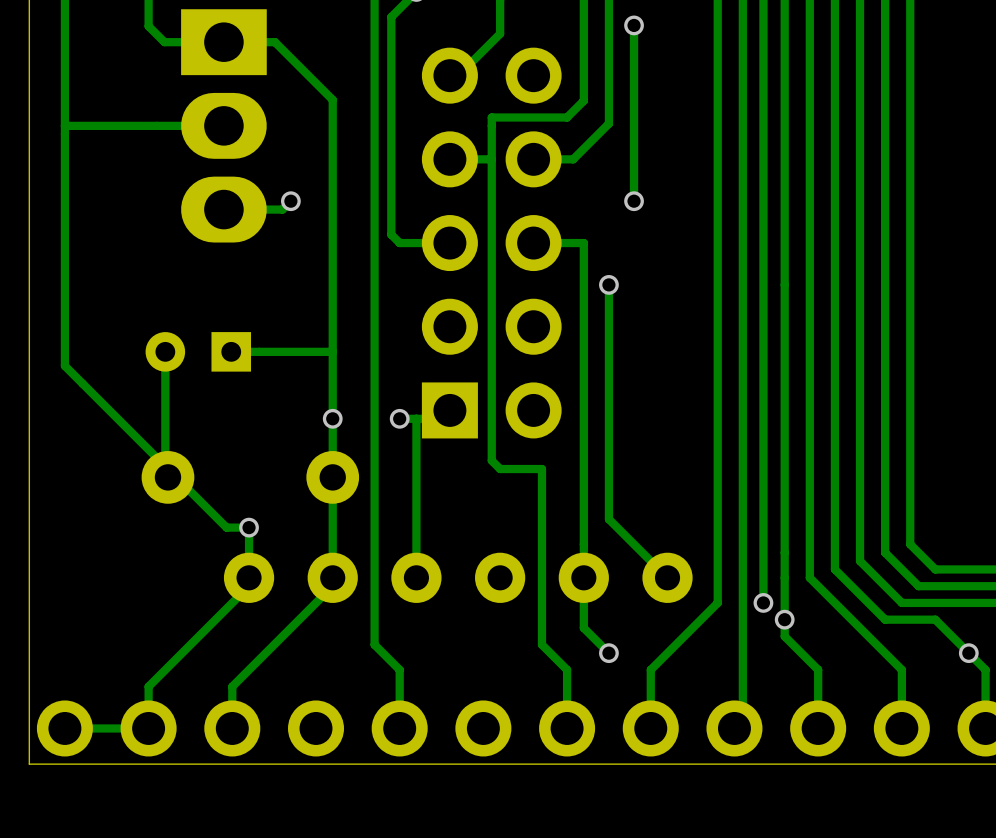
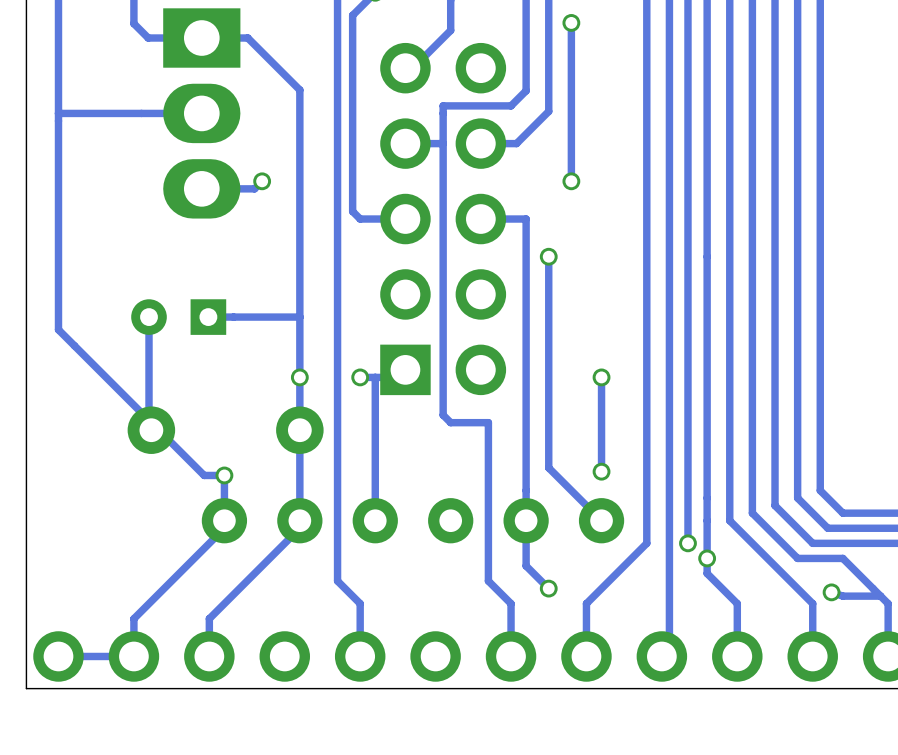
track: none -> (601, 377) (601, 471)
via: none -> (601, 377)
via: none -> (601, 471)
via position: (968, 653) -> (831, 592)
track: none -> (831, 592) (842, 596) (880, 596)

